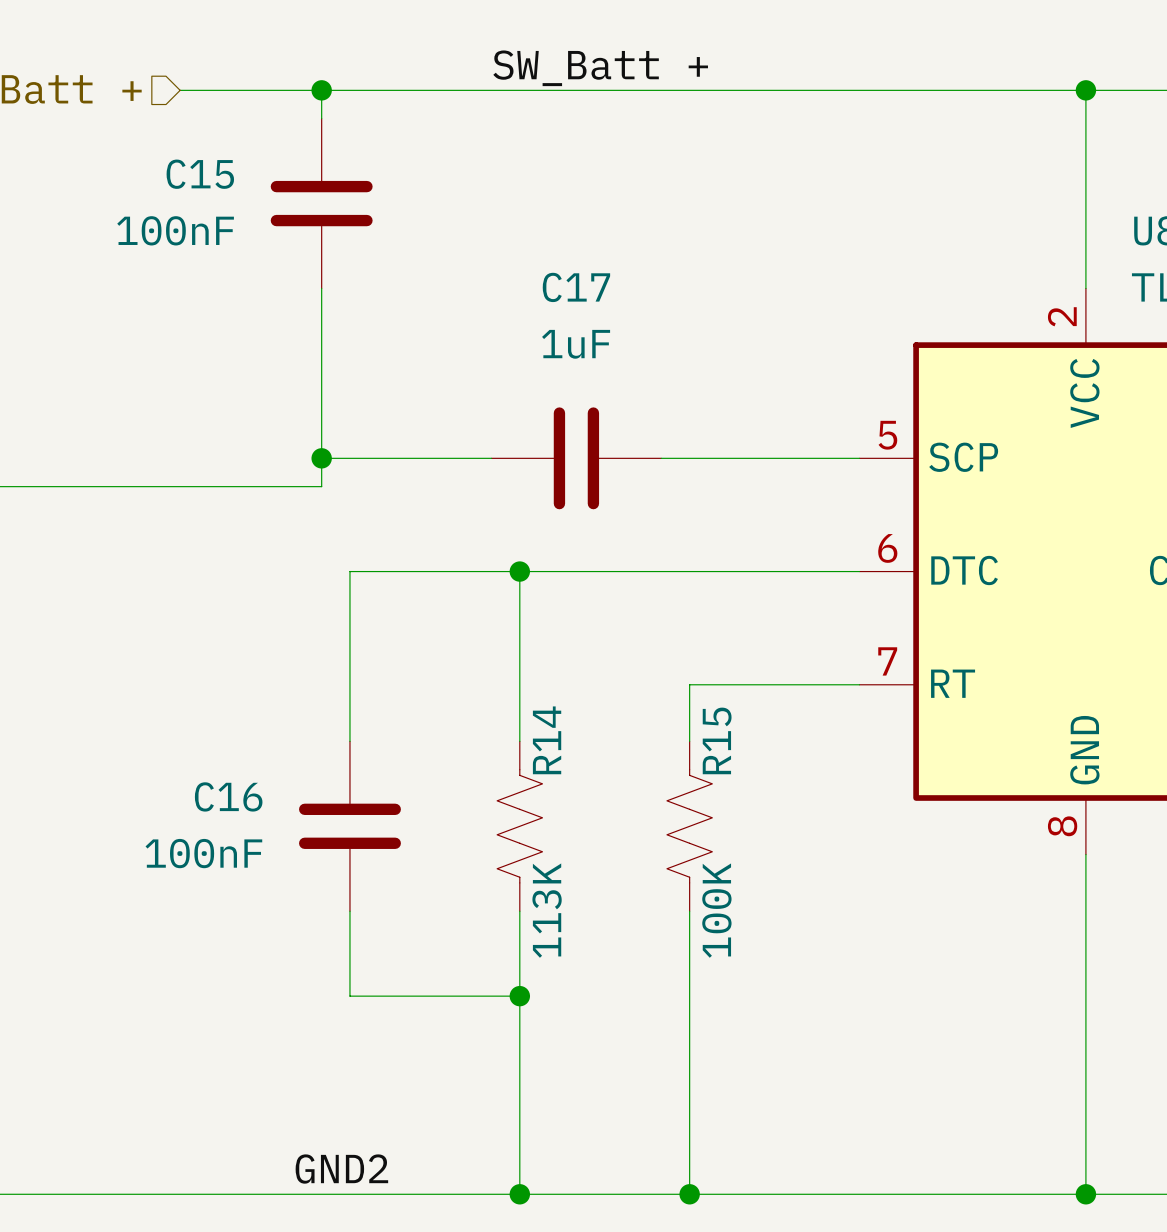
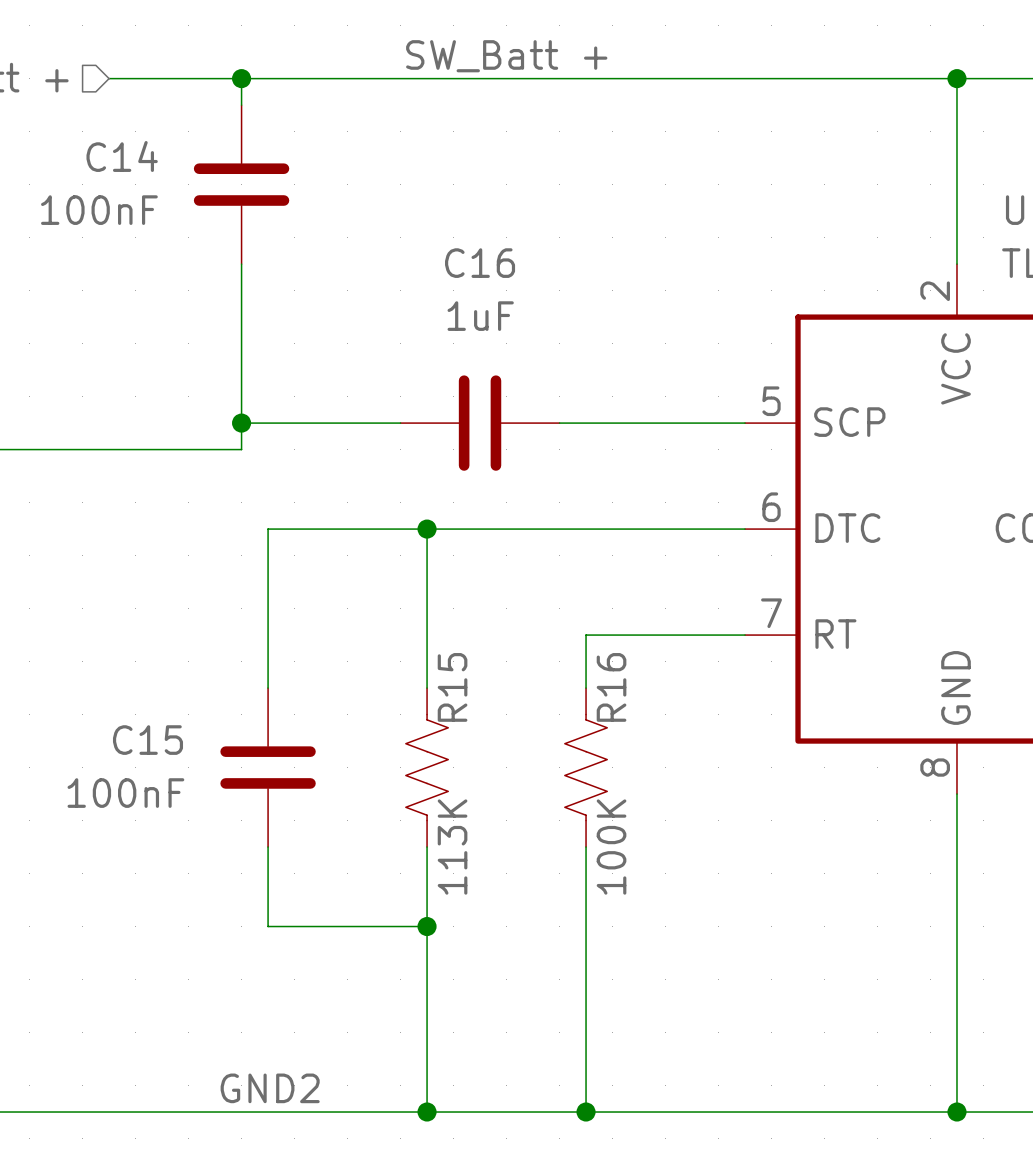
C15 name: C15 (200, 174) -> C14 (122, 156)
C17 name: C17 (576, 287) -> C16 (480, 263)
R14 name: R14 (547, 740) -> R15 (452, 687)
R15 name: R15 (717, 740) -> R16 (611, 687)
C16 name: C16 (228, 796) -> C15 (147, 740)

